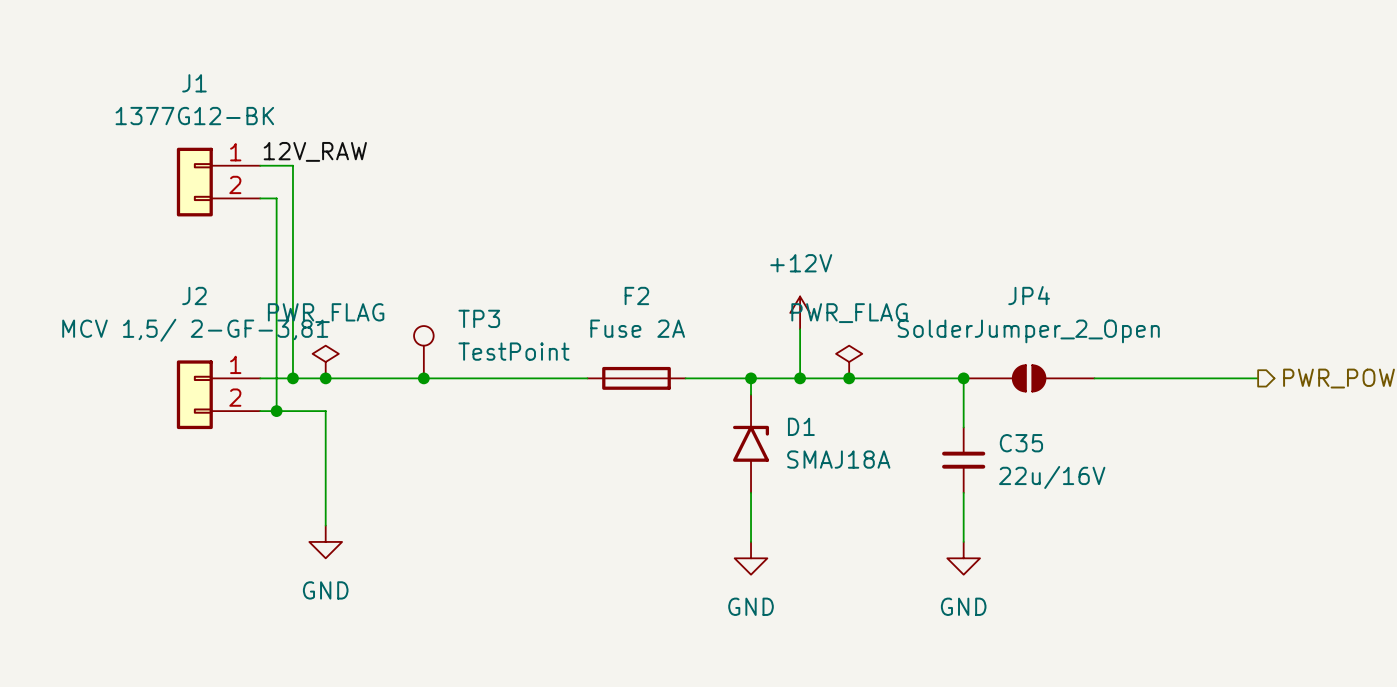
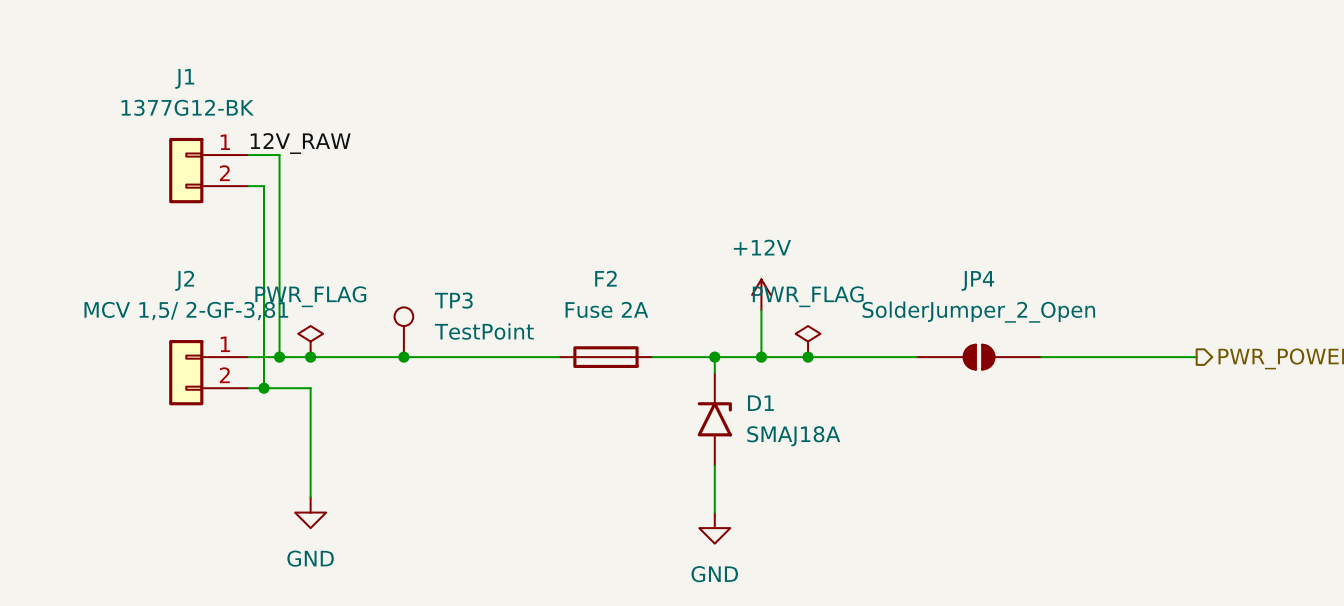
wire: (963, 378) (963, 427) -> none
junction: (963, 378) -> none
C35: 22u/16V (963, 460) -> none
wire: (963, 492) (963, 541) -> none
power symbol: GND (963, 558) -> none

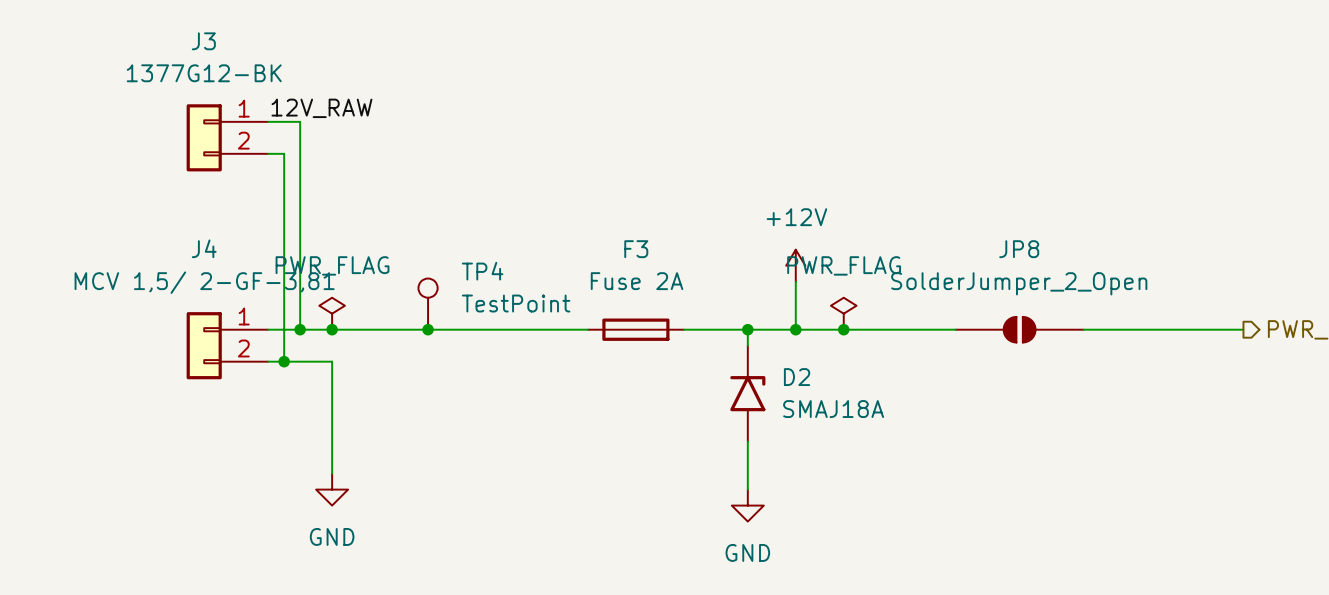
J1 name: J1 (184, 78) -> J3 (203, 41)
F2 name: F2 (605, 278) -> F3 (636, 249)
J2 name: J2 (184, 280) -> J4 (204, 248)
JP4 name: JP4 (977, 280) -> JP8 (1019, 249)
TP3 name: TP3 (453, 300) -> TP4 (482, 271)
D1 name: D1 (760, 403) -> D2 (797, 377)

